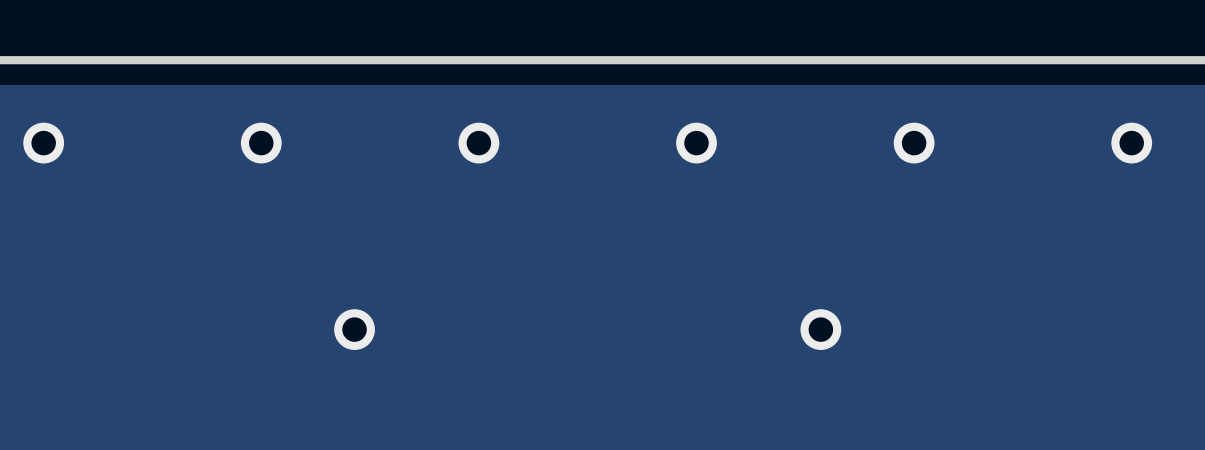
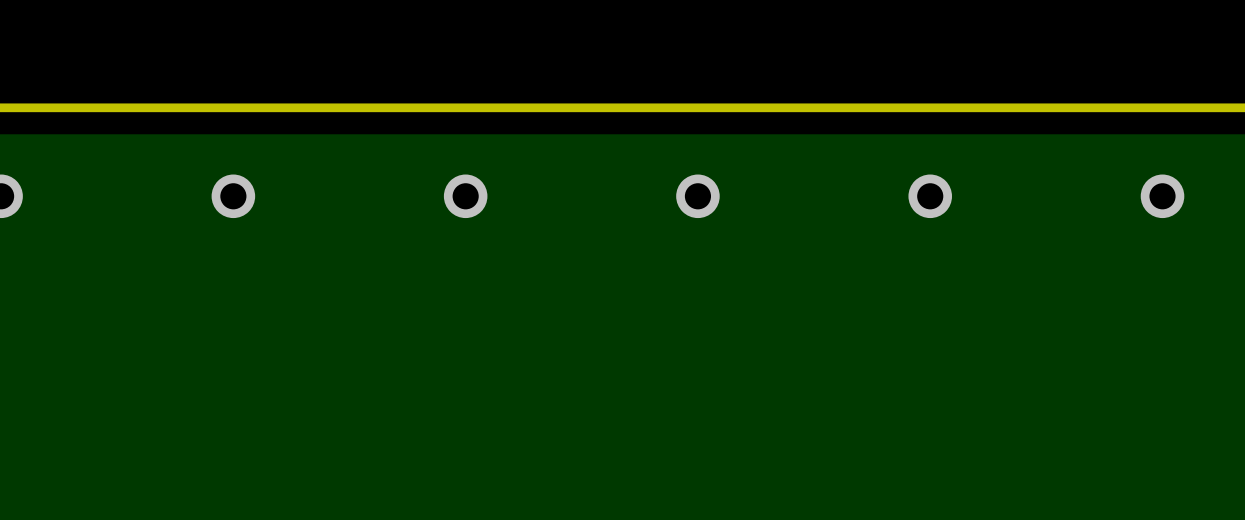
via: (354, 329) -> none
via: (820, 329) -> none

